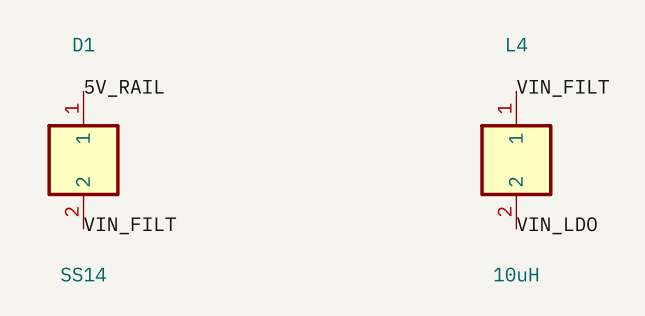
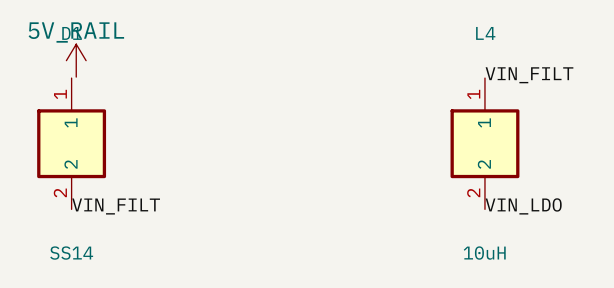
power symbol: none -> 5V_RAIL (76, 60)
label: 5V_RAIL (124, 88) -> none

